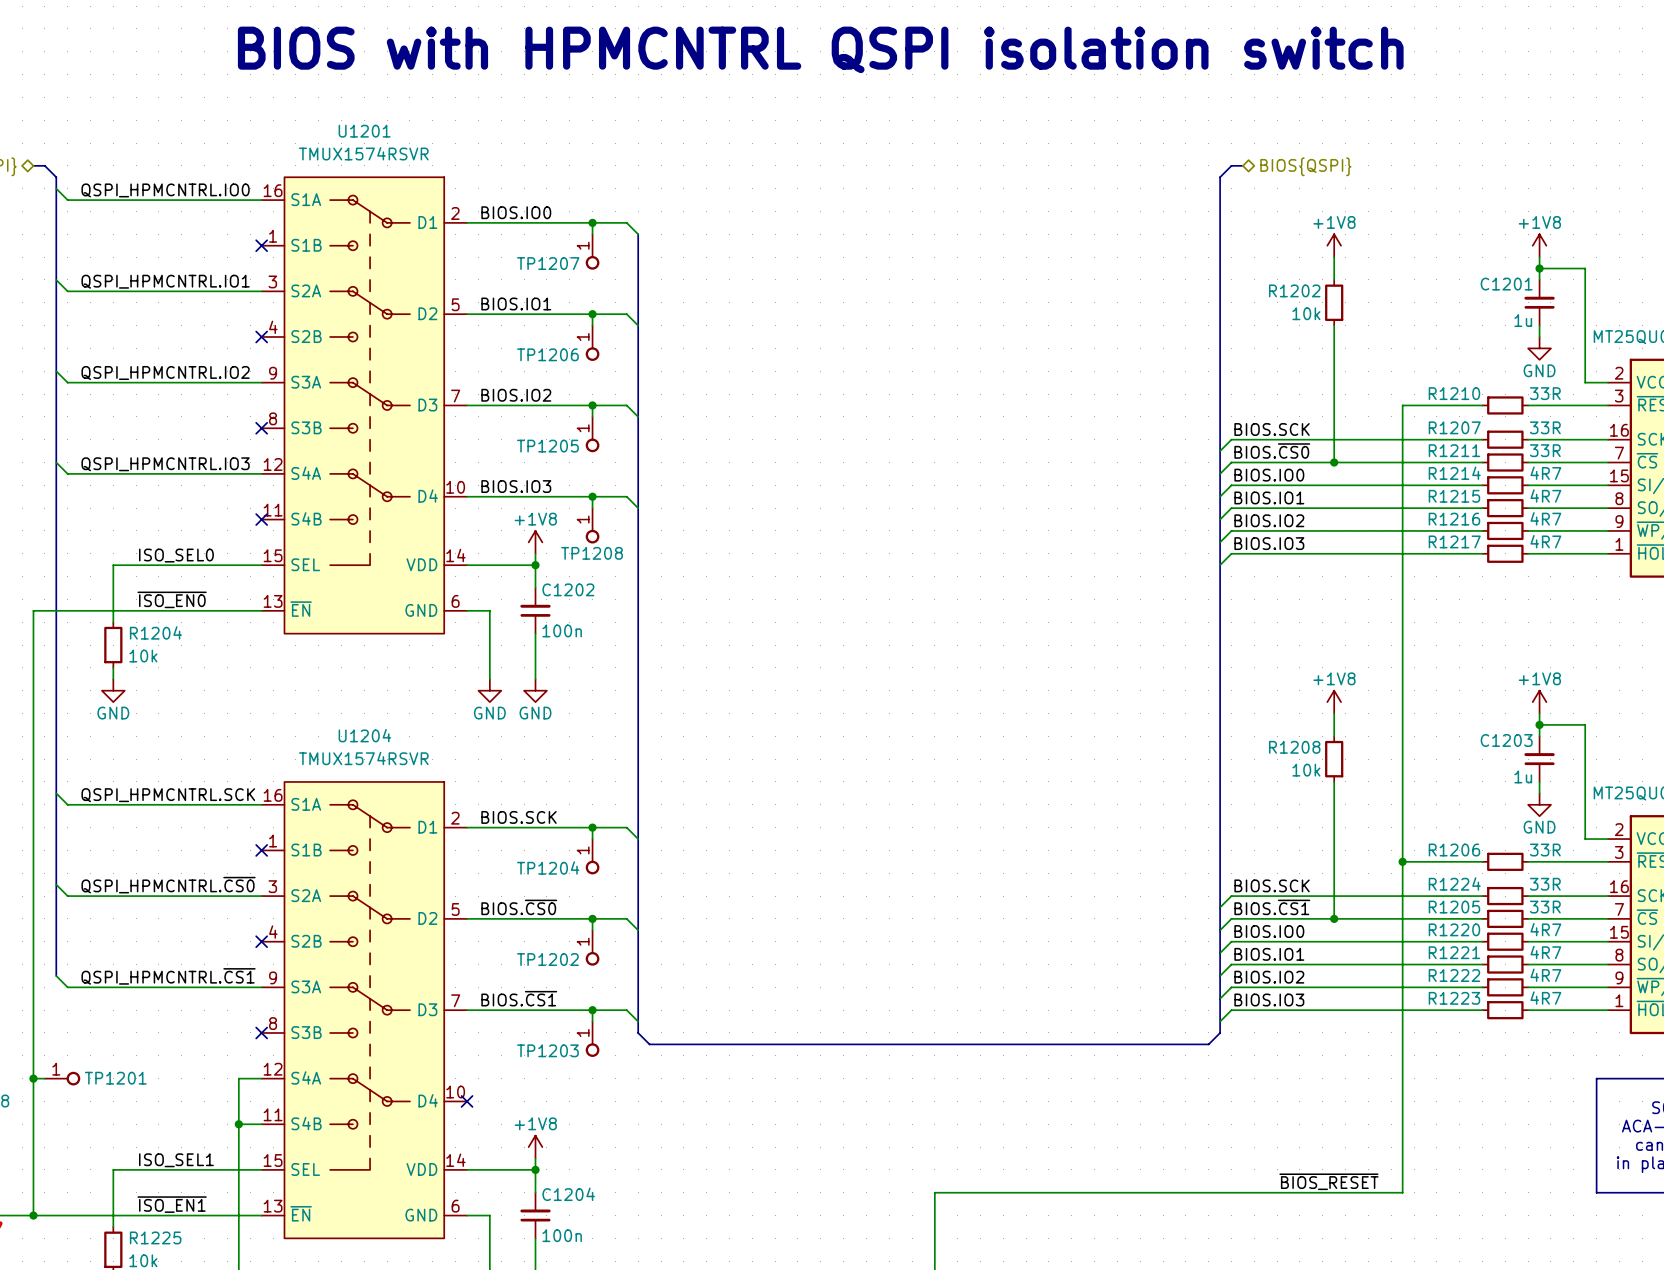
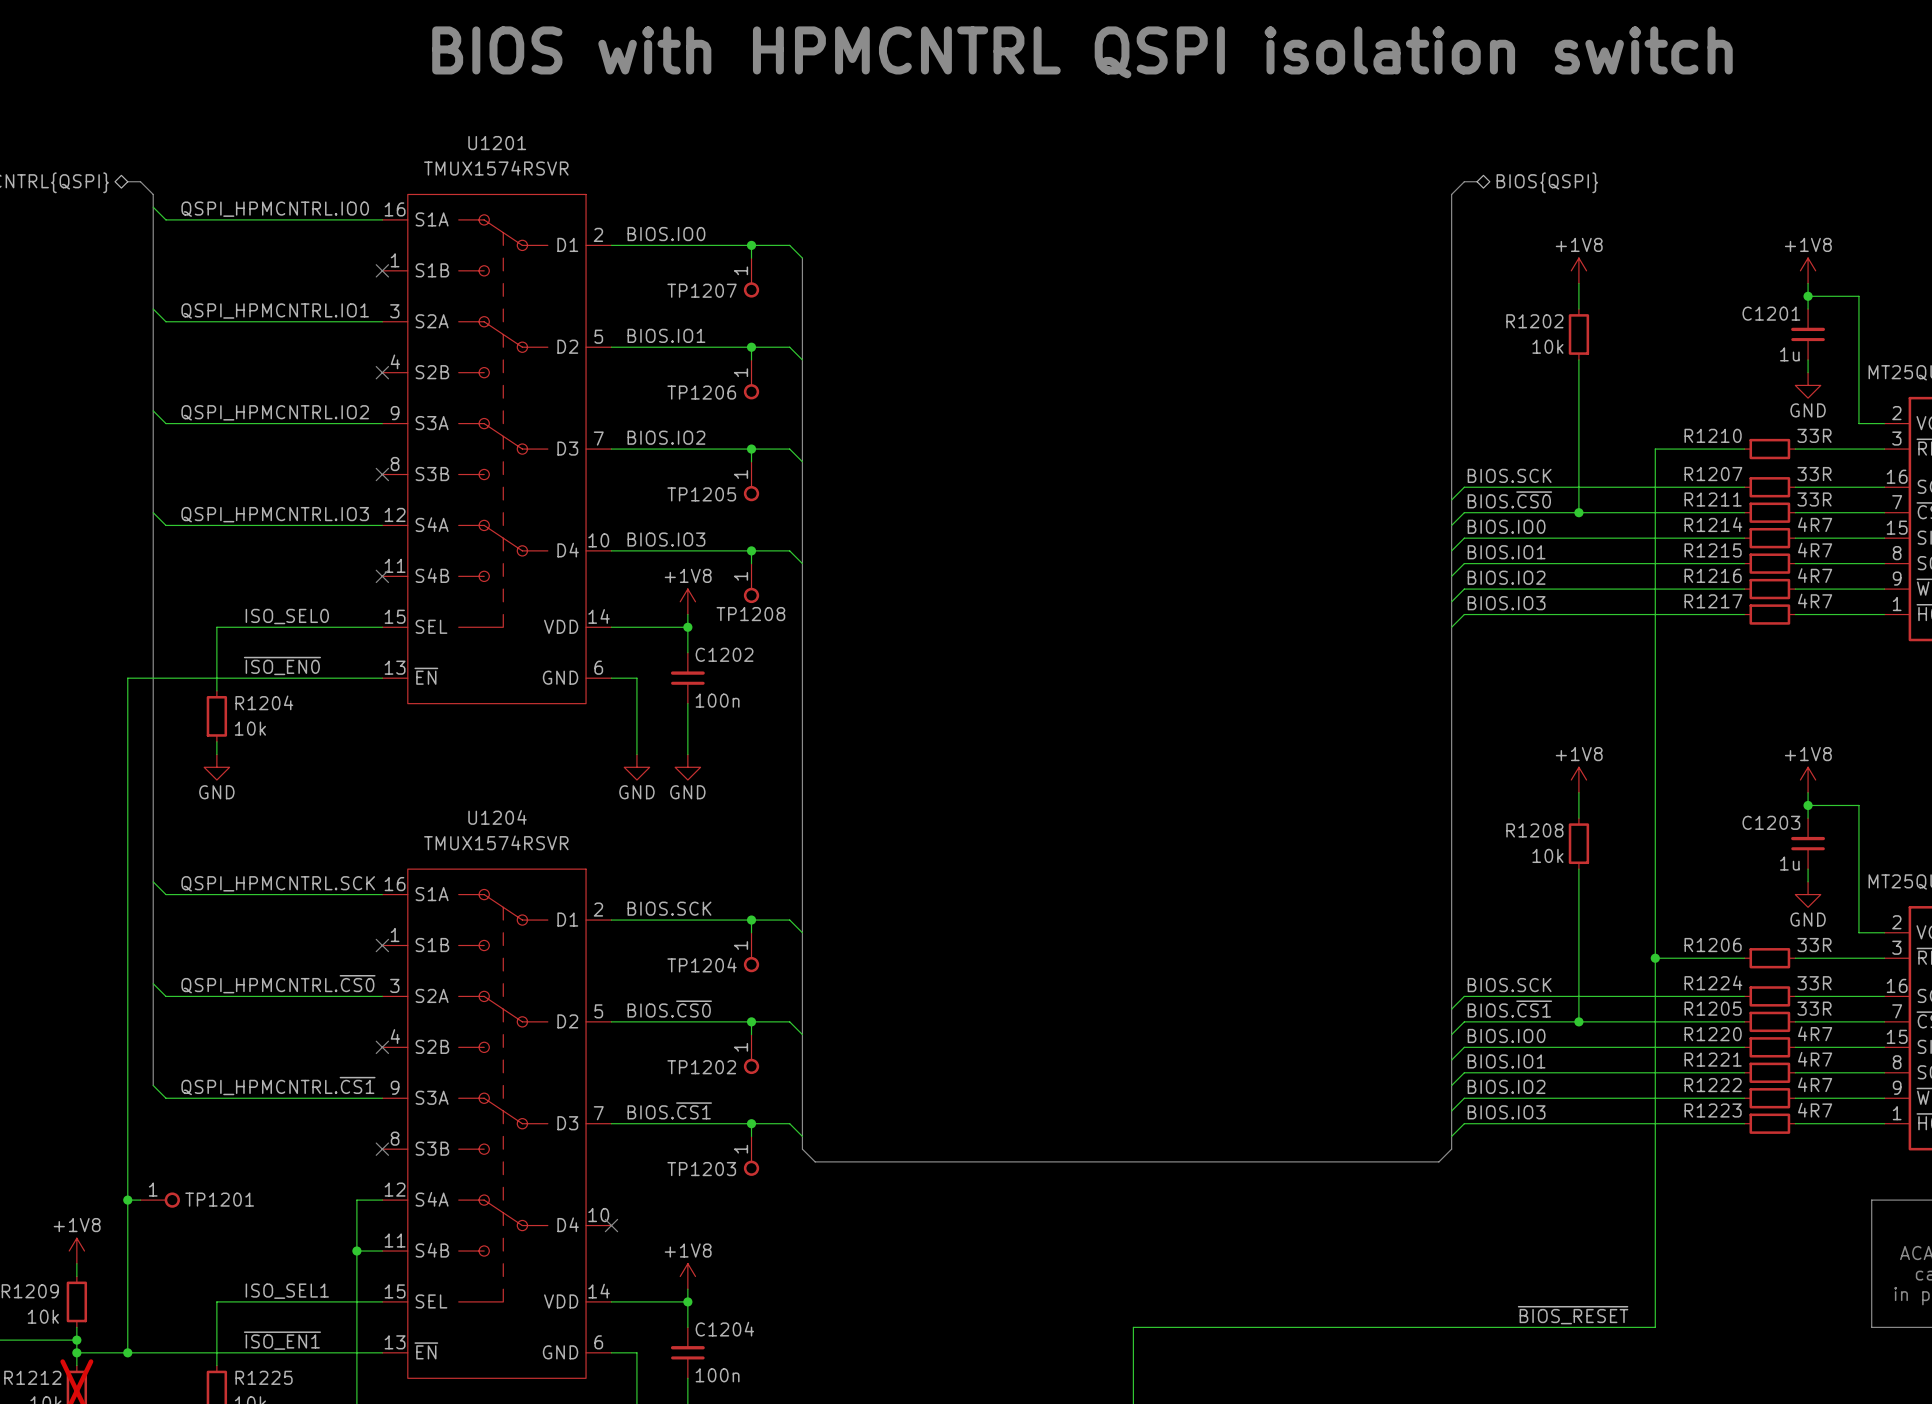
text position: BIOS with HPMCNTRL QSPI isolation switch (820, 49) -> BIOS with HPMCNTRL QSPI isolation switch (1082, 52)

